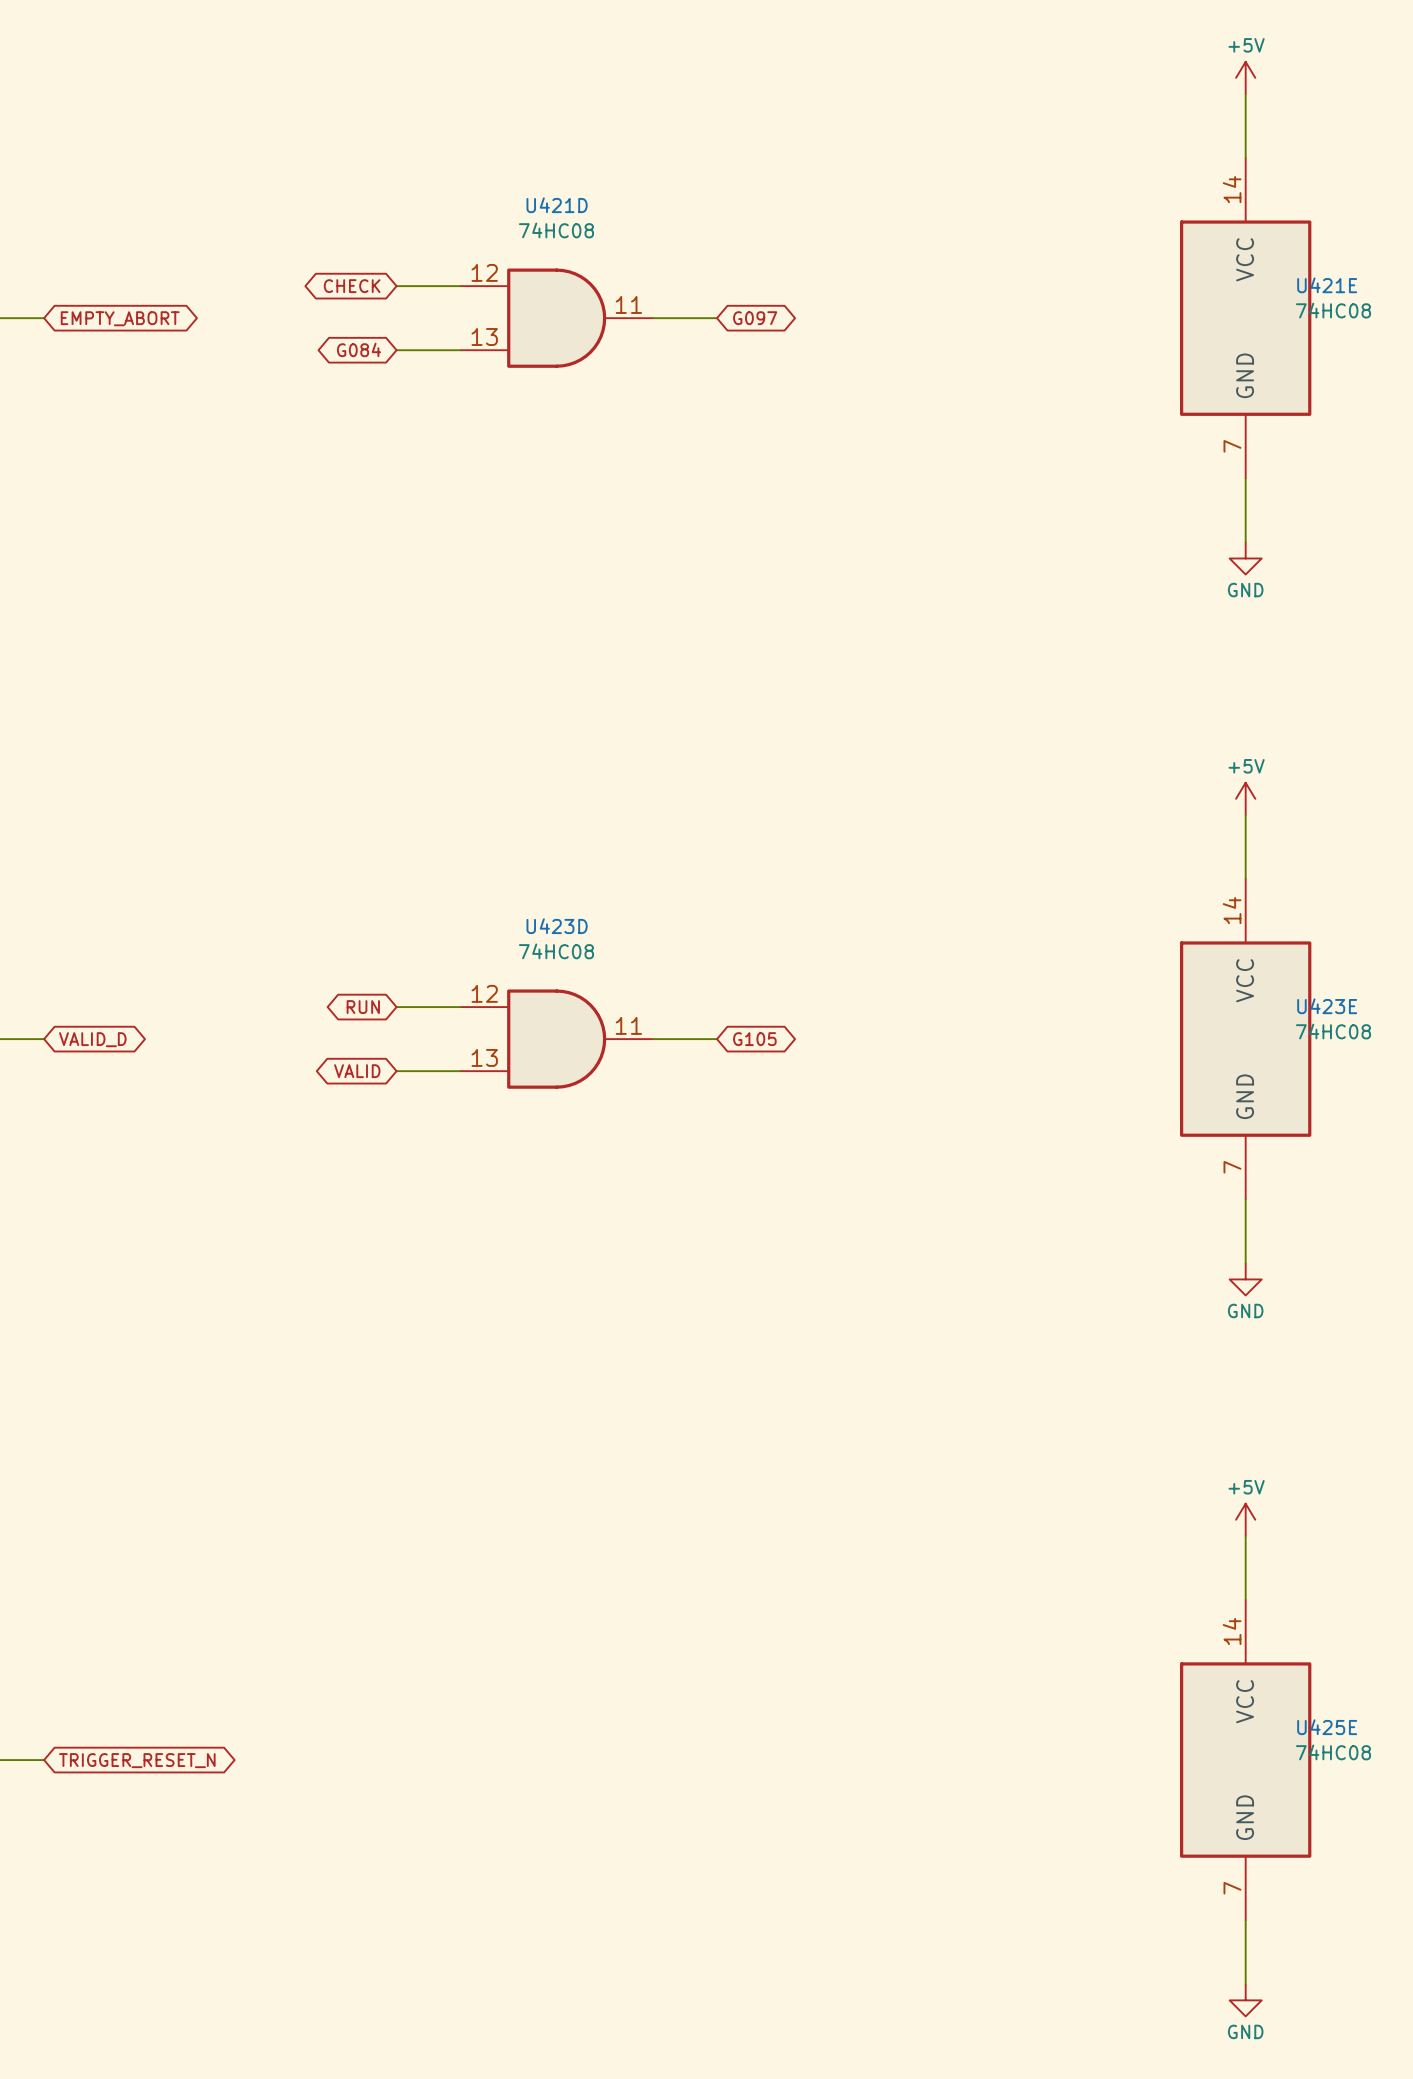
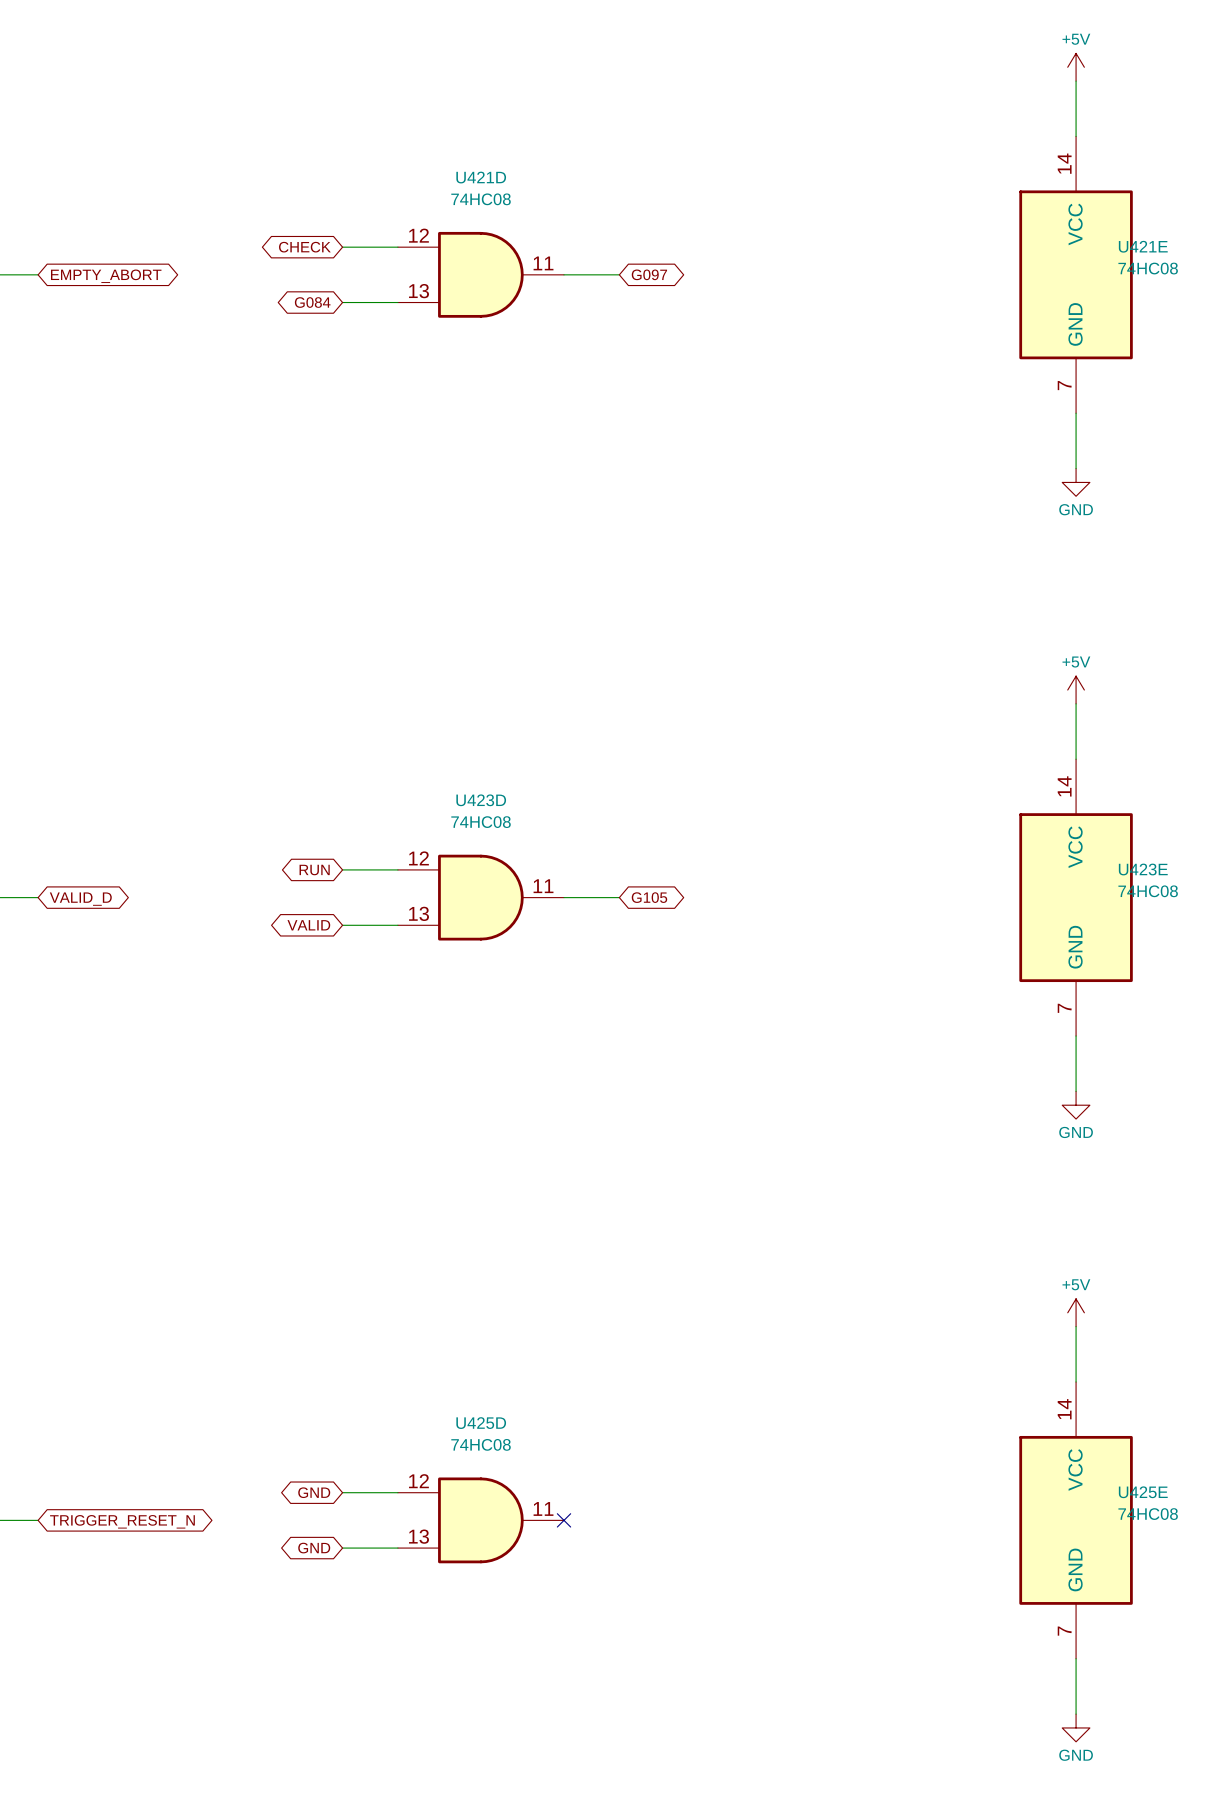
global label: none -> GND (314, 1492)
wire: none -> (342, 1492) (397, 1492)
U425D: none -> 74HC08 (480, 1520)
no-connect mark: none -> (564, 1520)
global label: none -> GND (314, 1548)
wire: none -> (342, 1548) (397, 1548)

